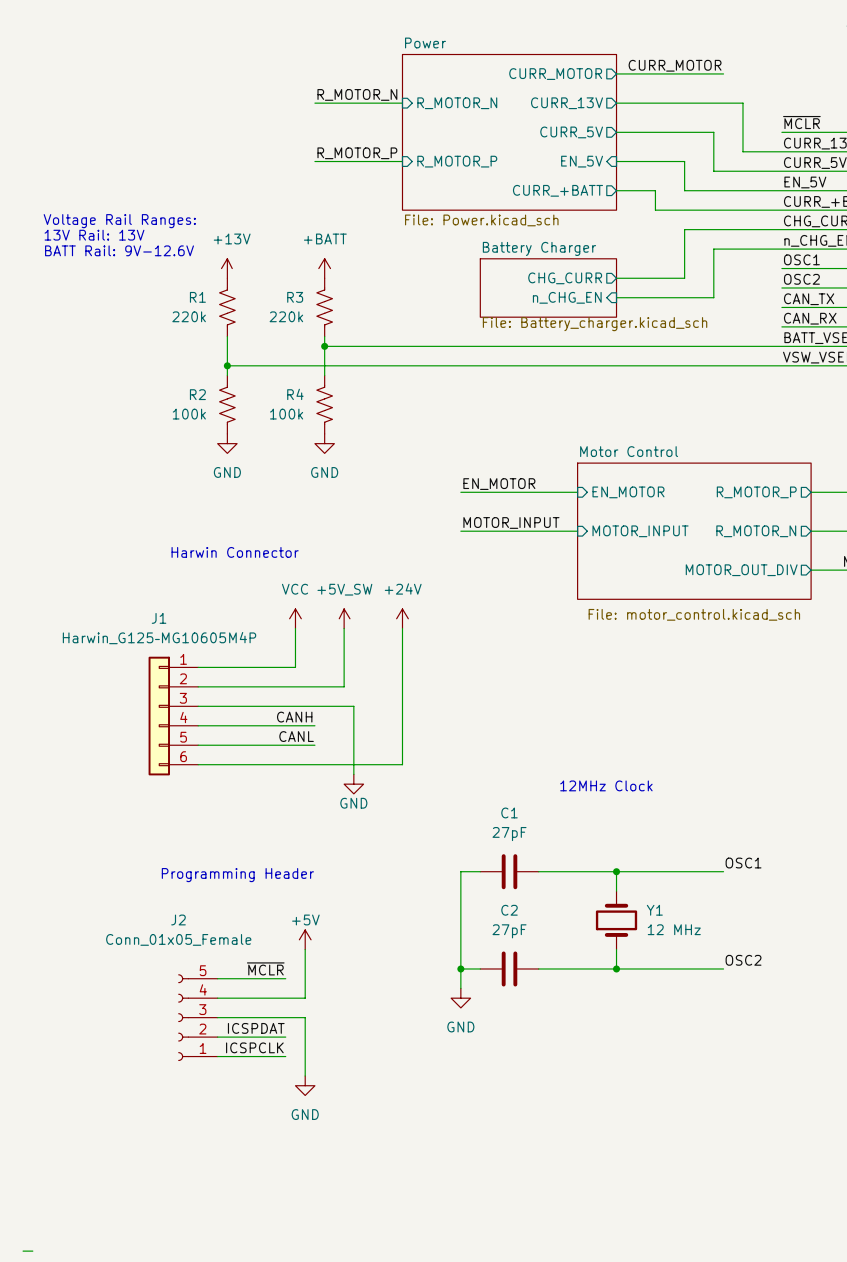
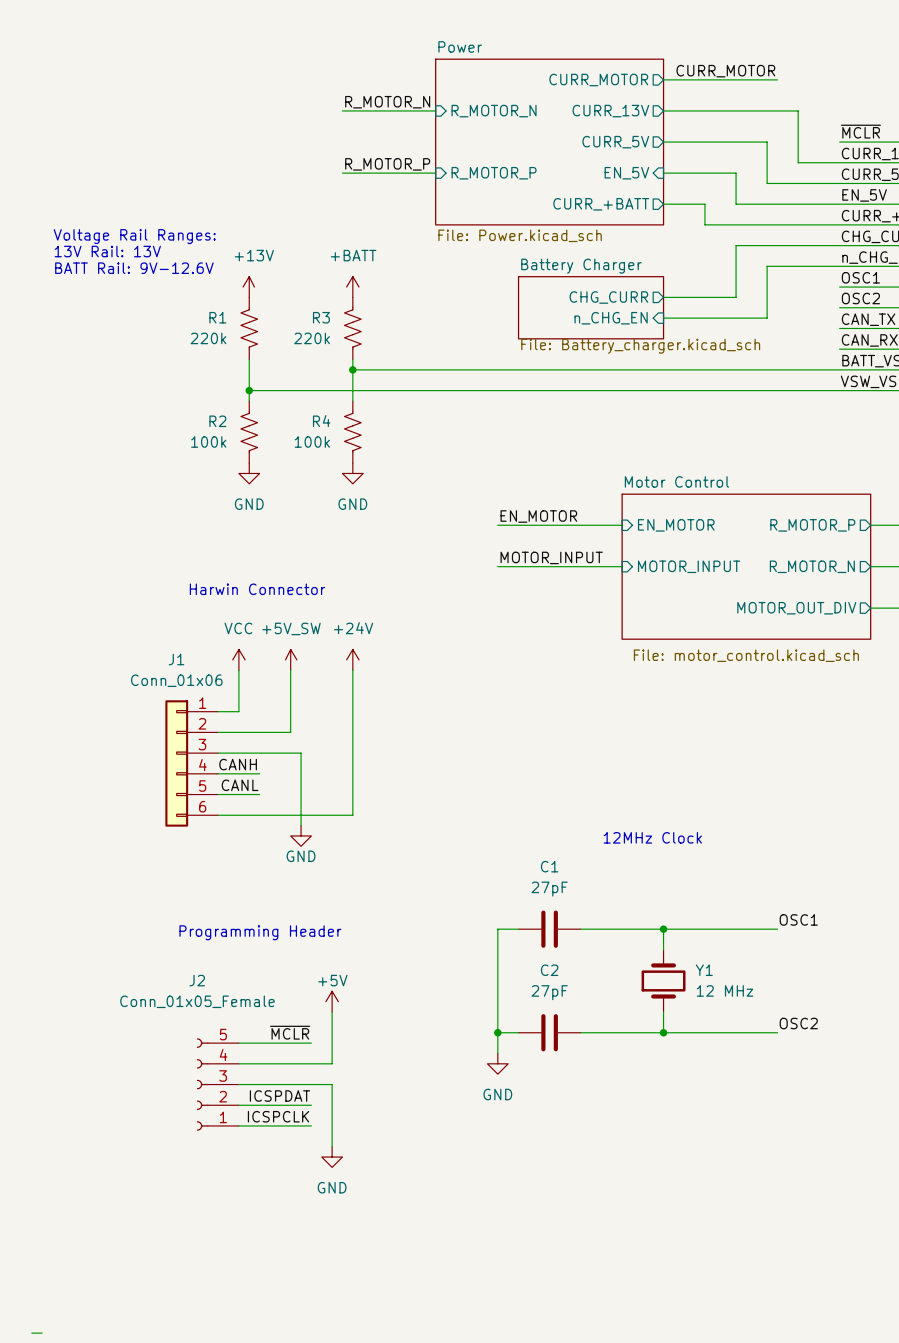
power symbol position: VCC (295, 618) -> VCC (238, 659)
power symbol position: +5V_SW (344, 618) -> +5V_SW (291, 659)
power symbol position: +24V (402, 618) -> +24V (352, 659)
wire: (295, 628) (295, 667) (217, 667) -> (238, 670) (238, 711)
wire: (344, 628) (344, 686) (266, 686) -> (290, 670) (290, 732)
wire: (402, 628) (402, 764) (324, 764) -> (352, 670) (352, 815)
J1 value: Harwin_G125–MG10605M4P (159, 638) -> Conn_01x06 (176, 680)
wire: (276, 706) (353, 706) (353, 774) -> (301, 753) (301, 825)
label position: CANH (294, 717) -> CANH (238, 764)
wire: (237, 725) (314, 725) -> none
label position: CANL (296, 736) -> CANL (240, 785)
wire: (237, 745) (314, 745) -> none
power symbol position: GND (353, 784) -> GND (301, 835)

